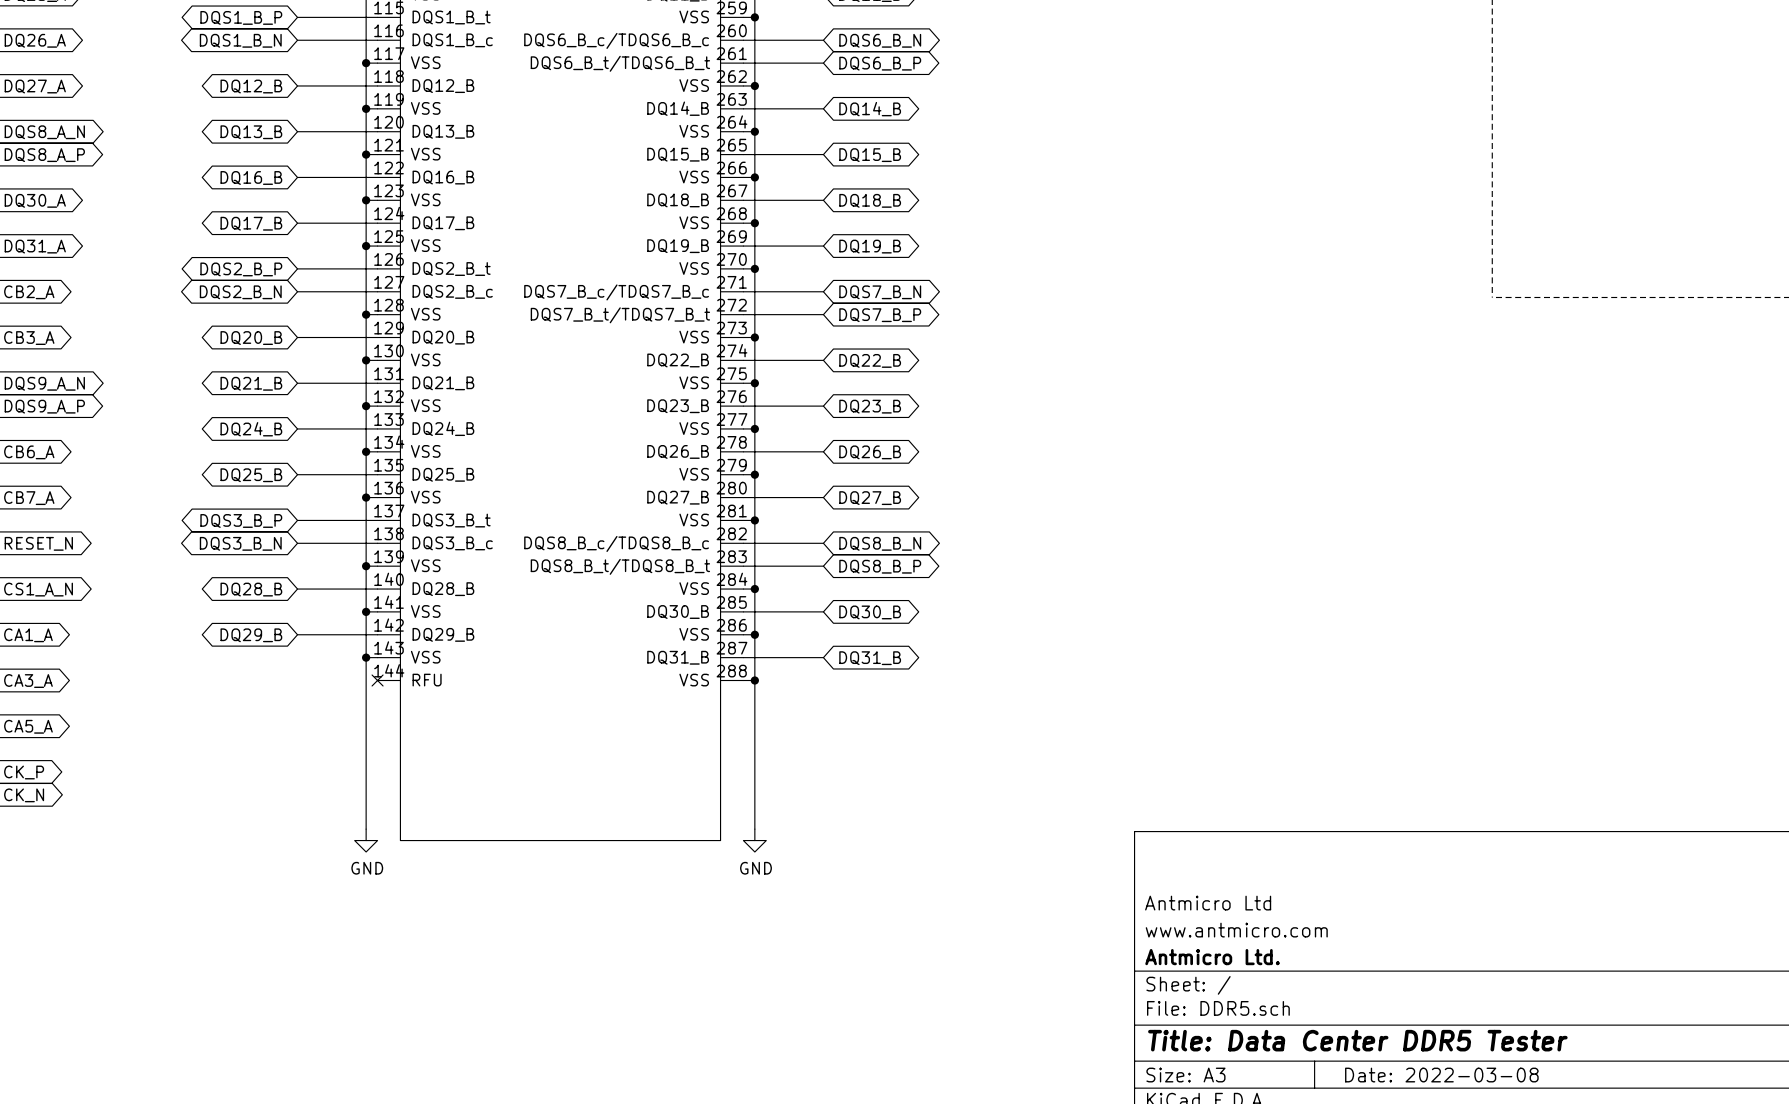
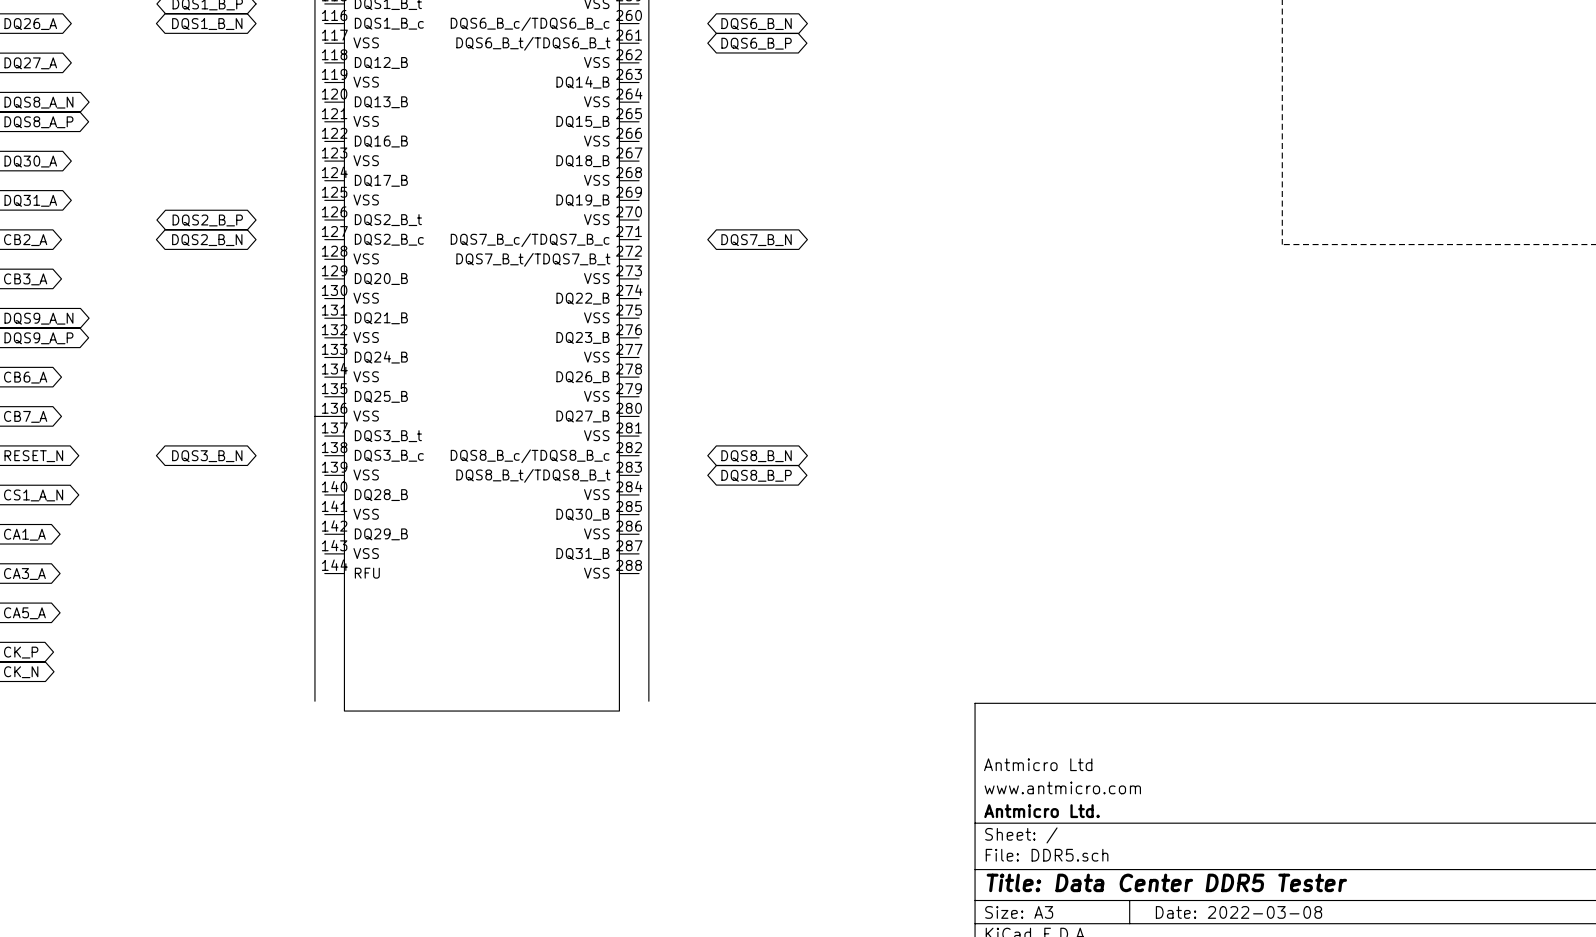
wire: (297, 17) (377, 17) -> none
wire: (743, 17) (754, 17) -> none
junction: (754, 17) -> none
wire: (297, 40) (377, 40) -> none
wire: (743, 40) (823, 40) -> none
wire: (366, 63) (377, 63) -> none
junction: (366, 63) -> none
wire: (743, 63) (823, 63) -> none
wire: (297, 85) (377, 85) -> none
wire: (743, 85) (754, 85) -> none
junction: (754, 85) -> none
global label: DQ12_B (251, 86) -> none
wire: (366, 108) (377, 108) -> none
junction: (366, 108) -> none
wire: (743, 108) (823, 108) -> none
global label: DQ14_B (870, 109) -> none
wire: (297, 131) (377, 131) -> none
wire: (743, 131) (754, 131) -> none
junction: (754, 131) -> none
global label: DQ13_B (251, 132) -> none
wire: (366, 154) (377, 154) -> none
junction: (366, 154) -> none
wire: (743, 154) (823, 154) -> none
global label: DQ15_B (870, 155) -> none
global label: DQ16_B (251, 177) -> none
wire: (297, 177) (377, 177) -> none
wire: (743, 177) (754, 177) -> none
junction: (754, 177) -> none
wire: (366, 200) (377, 200) -> none
junction: (366, 200) -> none
wire: (743, 200) (823, 200) -> none
global label: DQ18_B (870, 200) -> none
global label: DQ17_B (251, 223) -> none
wire: (297, 223) (377, 223) -> none
wire: (743, 223) (754, 223) -> none
junction: (754, 223) -> none
wire: (366, 246) (377, 246) -> none
junction: (366, 246) -> none
wire: (743, 246) (823, 246) -> none
global label: DQ19_B (870, 246) -> none
wire: (297, 268) (377, 268) -> none
wire: (743, 268) (754, 268) -> none
junction: (754, 268) -> none
wire: (297, 291) (377, 291) -> none
wire: (743, 291) (823, 291) -> none
wire: (366, 314) (377, 314) -> none
junction: (366, 314) -> none
wire: (743, 314) (823, 314) -> none
global label: DQS7_B_P (880, 315) -> none
wire: (297, 337) (377, 337) -> none
wire: (743, 337) (754, 337) -> none
junction: (754, 337) -> none
global label: DQ20_B (251, 338) -> none
wire: (366, 360) (377, 360) -> none
junction: (366, 360) -> none
wire: (743, 360) (823, 360) -> none
global label: DQ22_B (870, 360) -> none
global label: DQ21_B (251, 383) -> none
wire: (297, 383) (377, 383) -> none
wire: (743, 383) (754, 383) -> none
junction: (754, 383) -> none
wire: (366, 406) (377, 406) -> none
junction: (366, 406) -> none
wire: (743, 406) (823, 406) -> none
global label: DQ23_B (870, 406) -> none
wire: (297, 428) (377, 428) -> none
wire: (743, 428) (754, 428) -> none
junction: (754, 428) -> none
global label: DQ24_B (251, 429) -> none
wire: (366, 451) (377, 451) -> none
junction: (366, 451) -> none
wire: (743, 451) (823, 451) -> none
global label: DQ26_B (870, 452) -> none
wire: (297, 474) (377, 474) -> none
wire: (743, 474) (754, 474) -> none
junction: (754, 474) -> none
global label: DQ25_B (251, 475) -> none
junction: (366, 497) -> none
wire: (743, 497) (823, 497) -> none
global label: DQ27_B (870, 498) -> none
global label: DQS3_B_P (241, 520) -> none
wire: (297, 520) (377, 520) -> none
wire: (743, 520) (754, 520) -> none
junction: (754, 520) -> none
wire: (297, 543) (377, 543) -> none
wire: (743, 543) (823, 543) -> none
wire: (366, 566) (377, 566) -> none
junction: (366, 566) -> none
wire: (743, 566) (823, 566) -> none
global label: DQ28_B (251, 589) -> none
wire: (297, 589) (377, 589) -> none
wire: (743, 589) (754, 589) -> none
junction: (754, 589) -> none
wire: (366, 611) (377, 611) -> none
junction: (366, 611) -> none
wire: (743, 611) (823, 611) -> none
global label: DQ30_B (870, 612) -> none
wire: (297, 634) (377, 634) -> none
wire: (743, 634) (754, 634) -> none
junction: (754, 634) -> none
global label: DQ29_B (251, 635) -> none
wire: (366, 657) (377, 657) -> none
junction: (366, 657) -> none
wire: (743, 657) (823, 657) -> none
global label: DQ31_B (870, 658) -> none
no-connect mark: (377, 680) -> none
wire: (743, 680) (754, 680) -> none
junction: (754, 680) -> none
power symbol: GND (366, 840) -> none
power symbol: GND (754, 840) -> none

